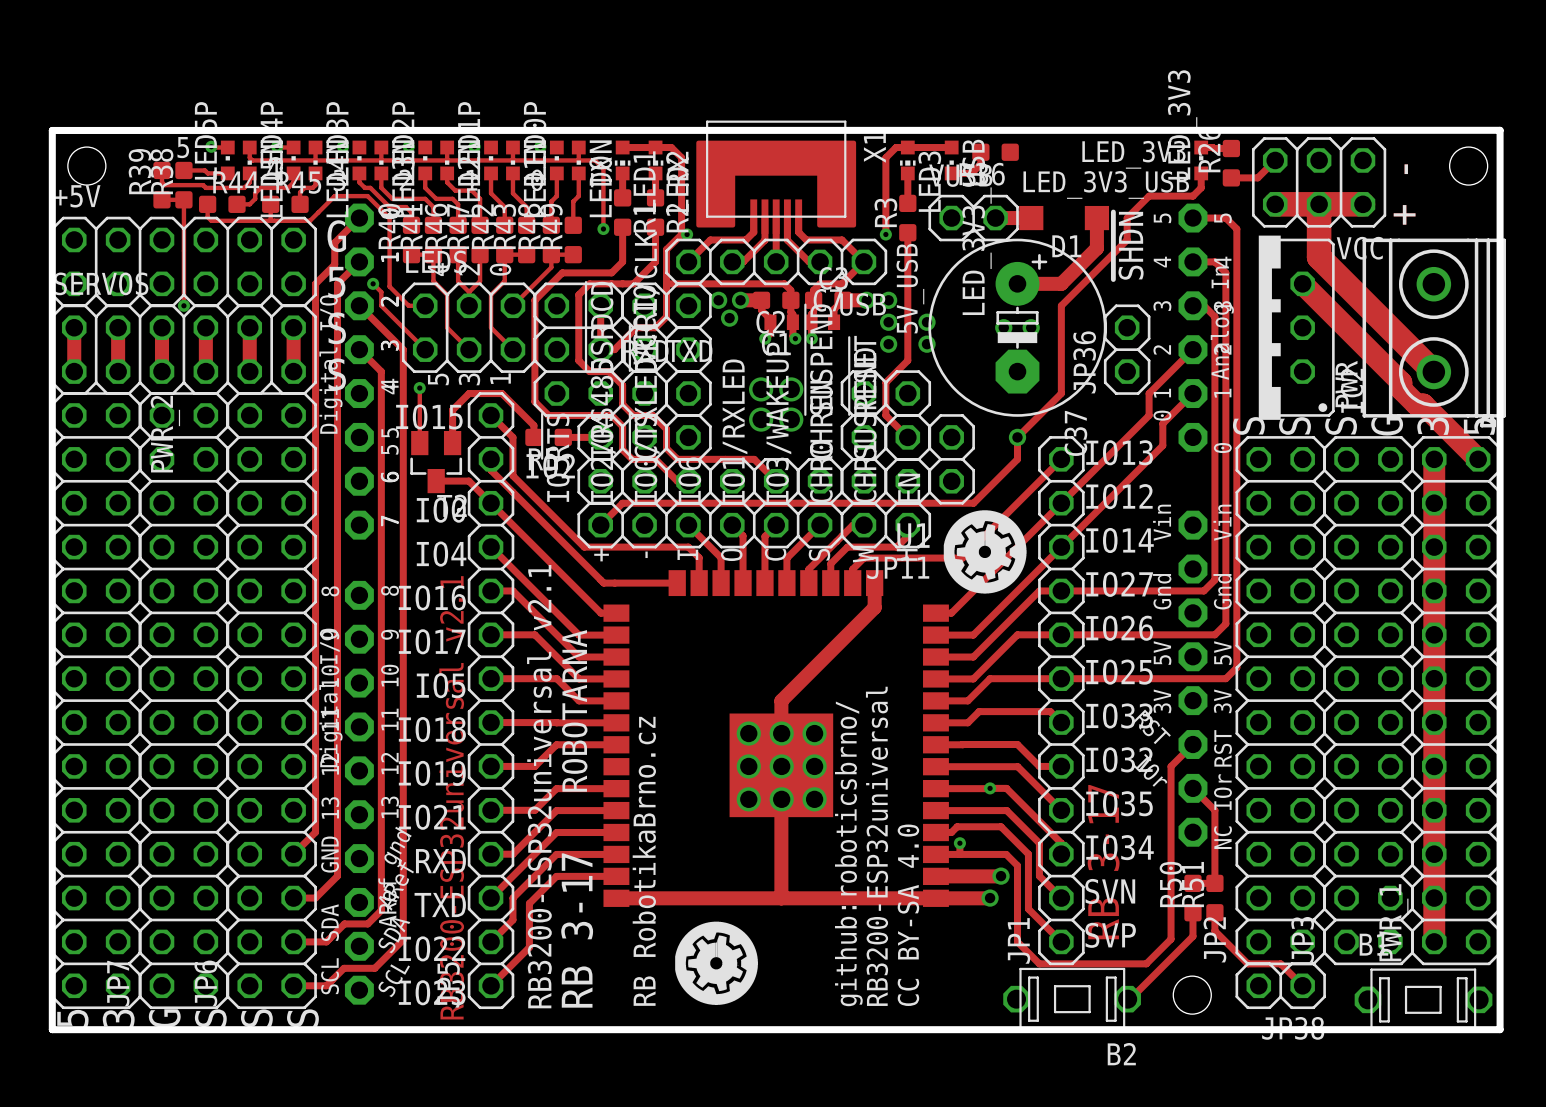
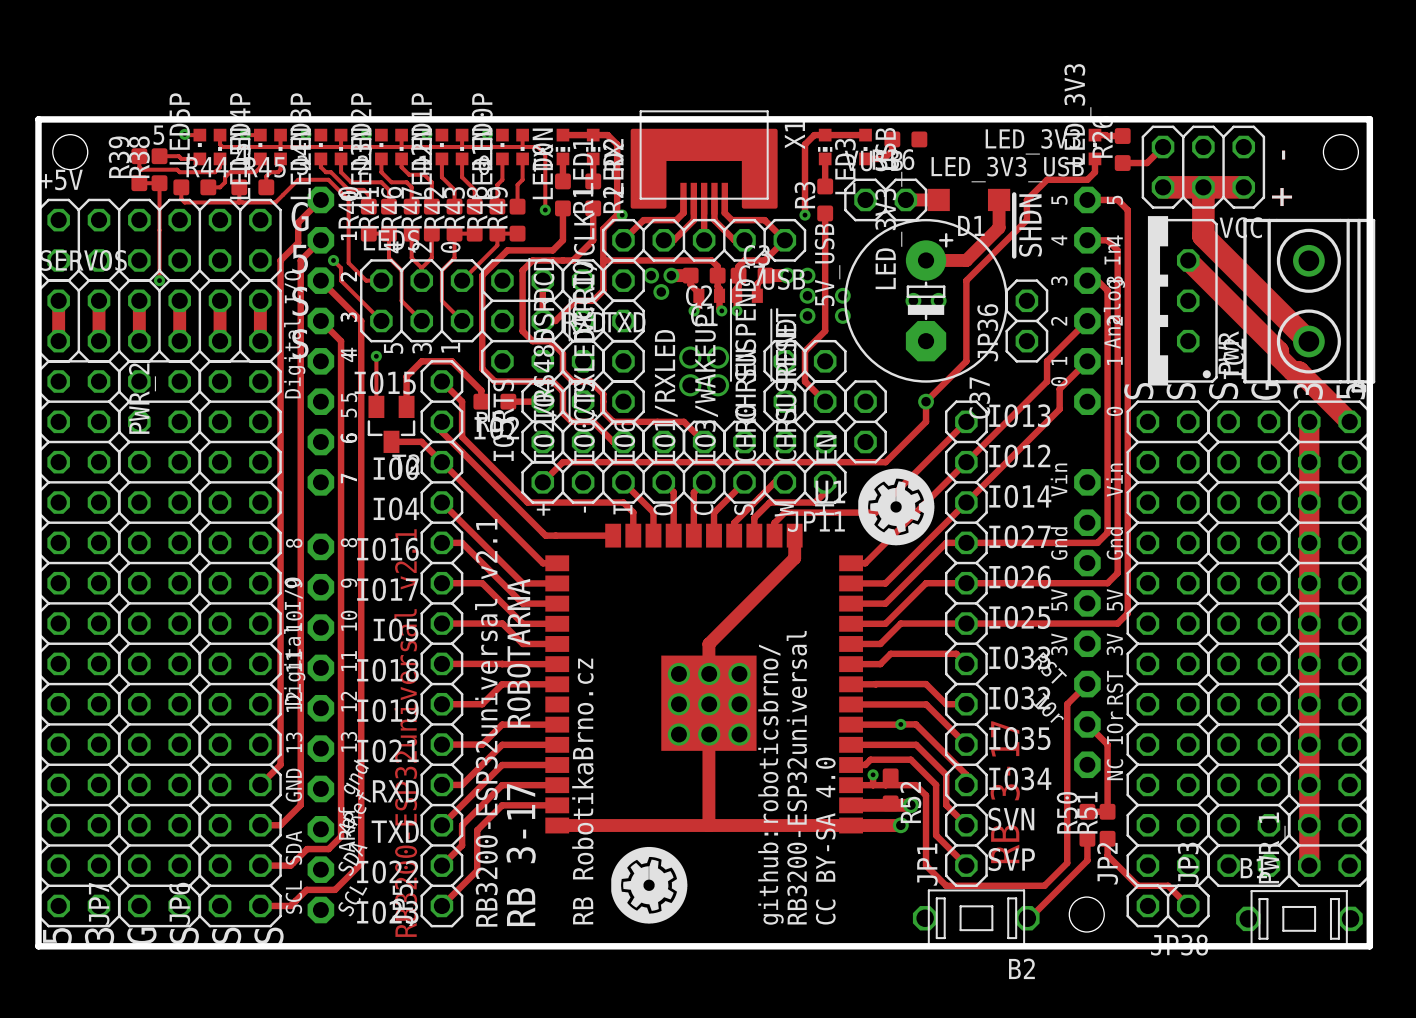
R52: none -> (890, 789)

